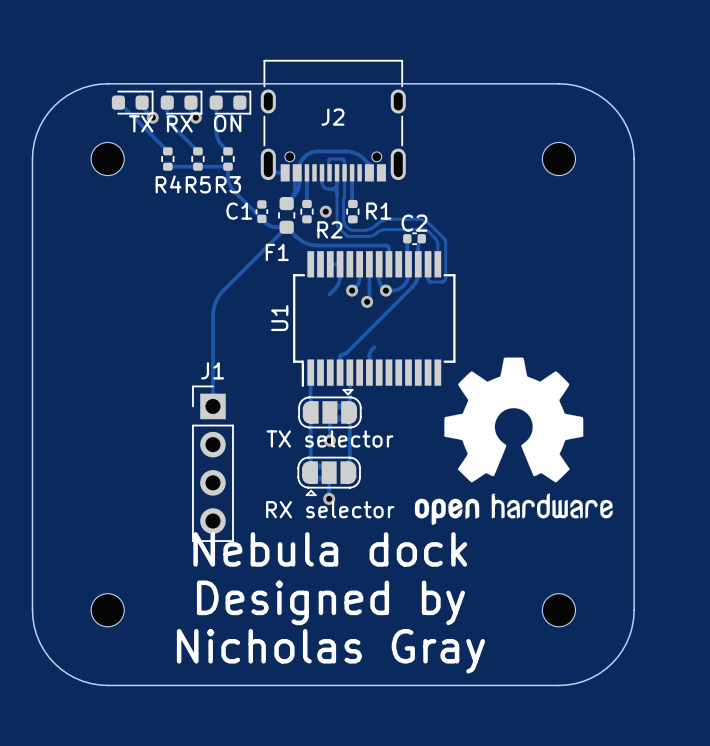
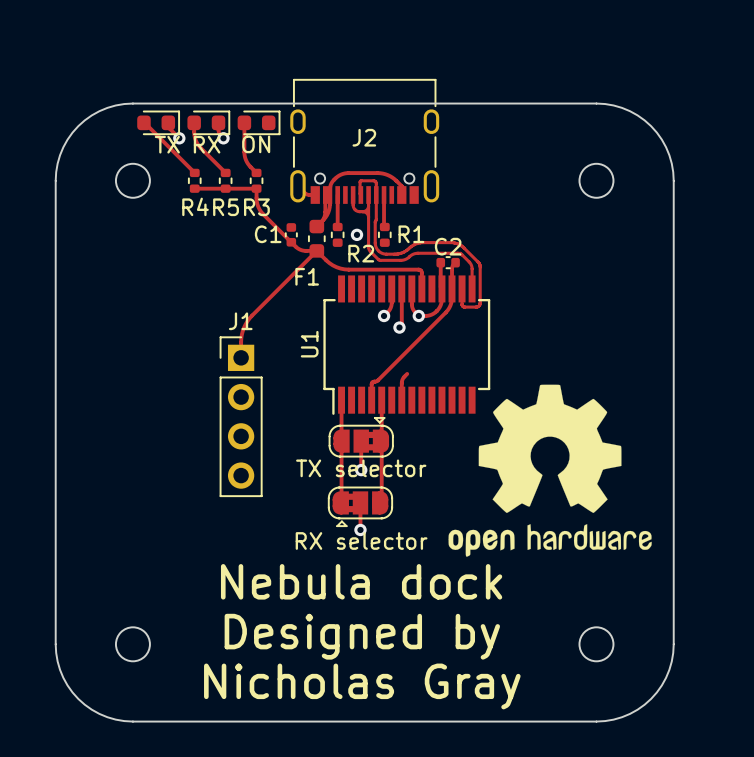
track: (330, 264) (340, 264) (340, 276) (337, 285) (329, 294) -> none
track: (212, 331) (212, 406) -> none
J1 position: (212, 463) -> (241, 416)

